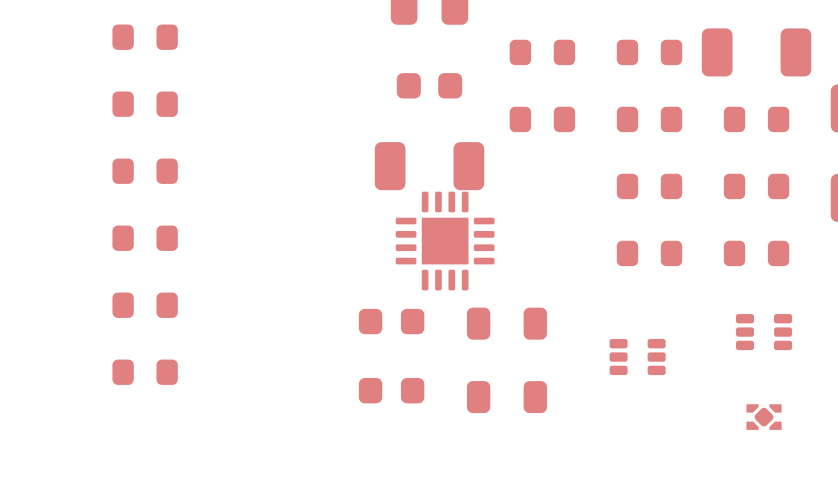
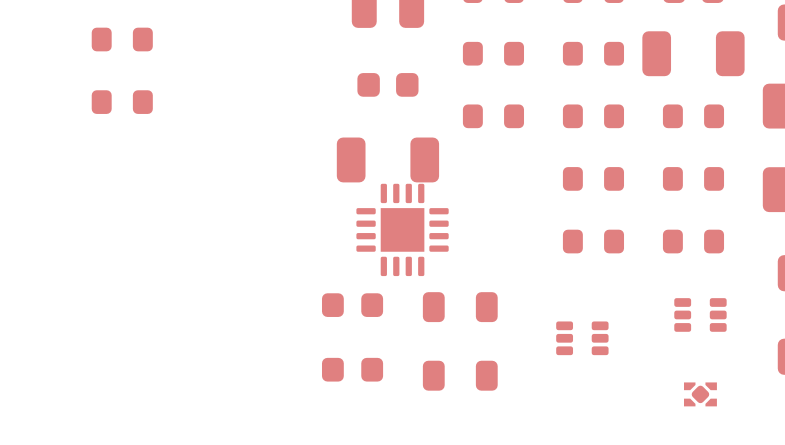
part: (145, 171) -> none
part: (145, 238) -> none
part: (145, 305) -> none
part: (145, 372) -> none

